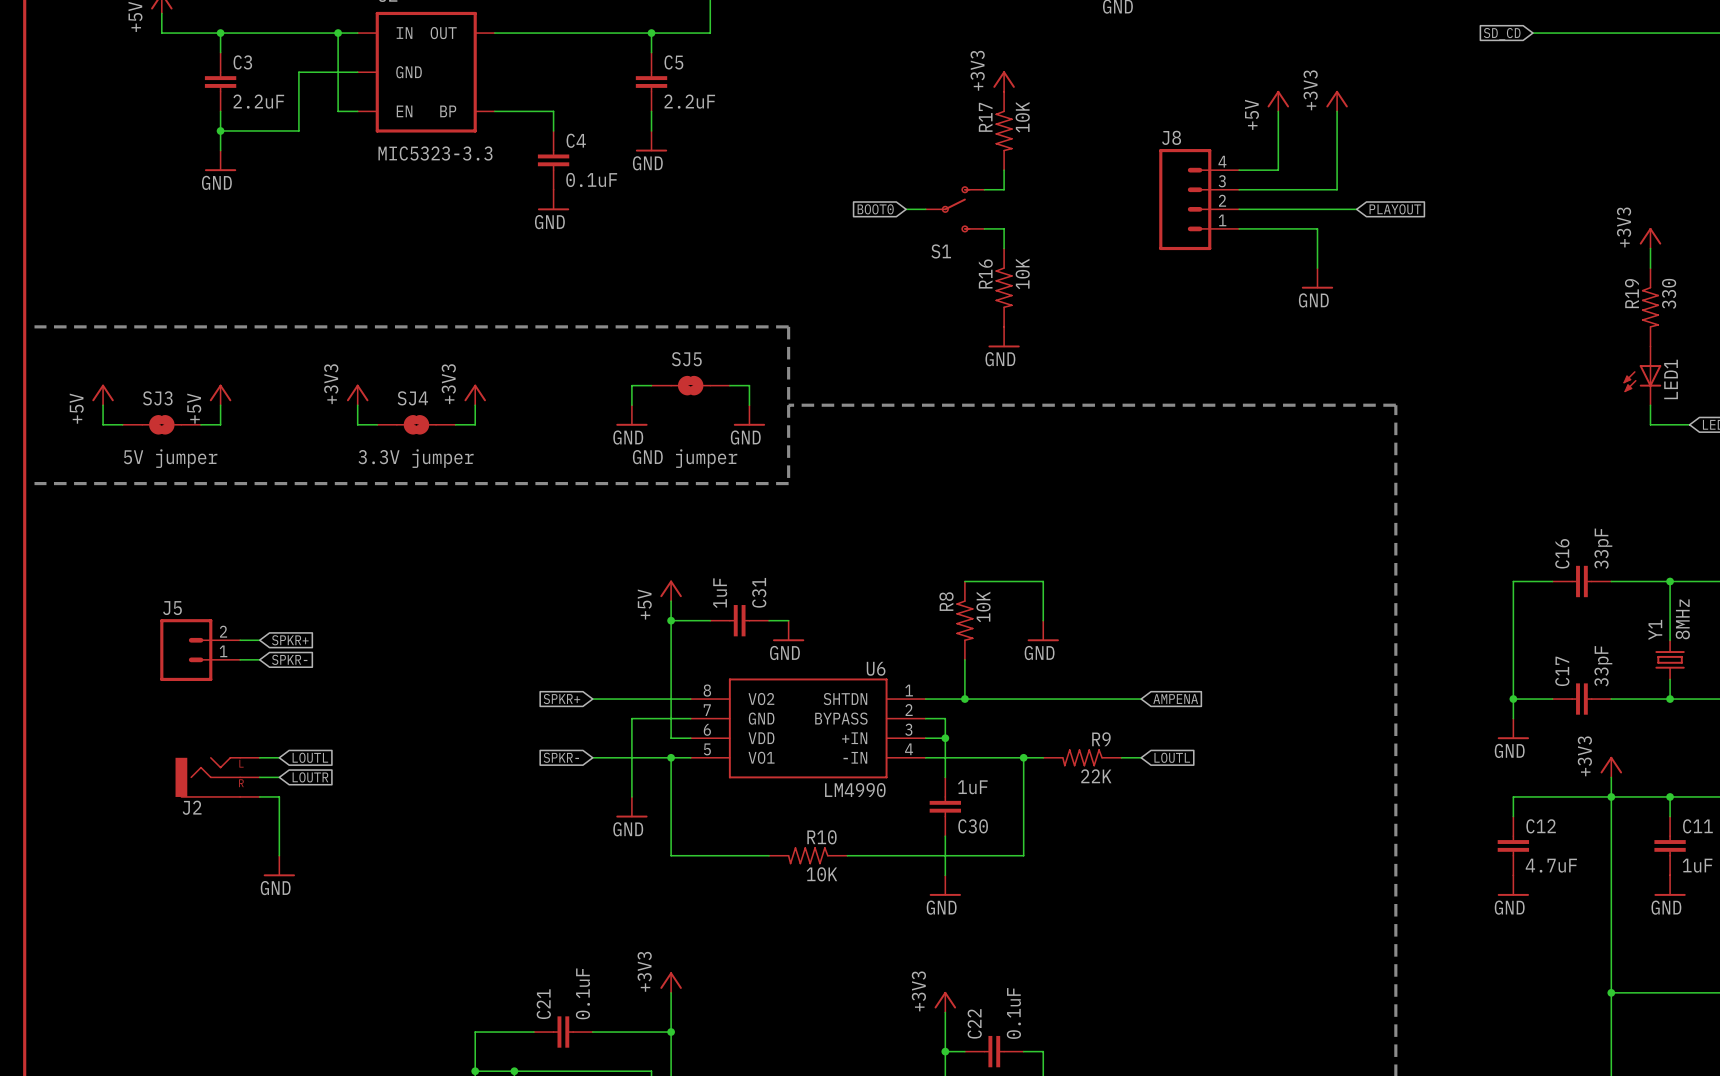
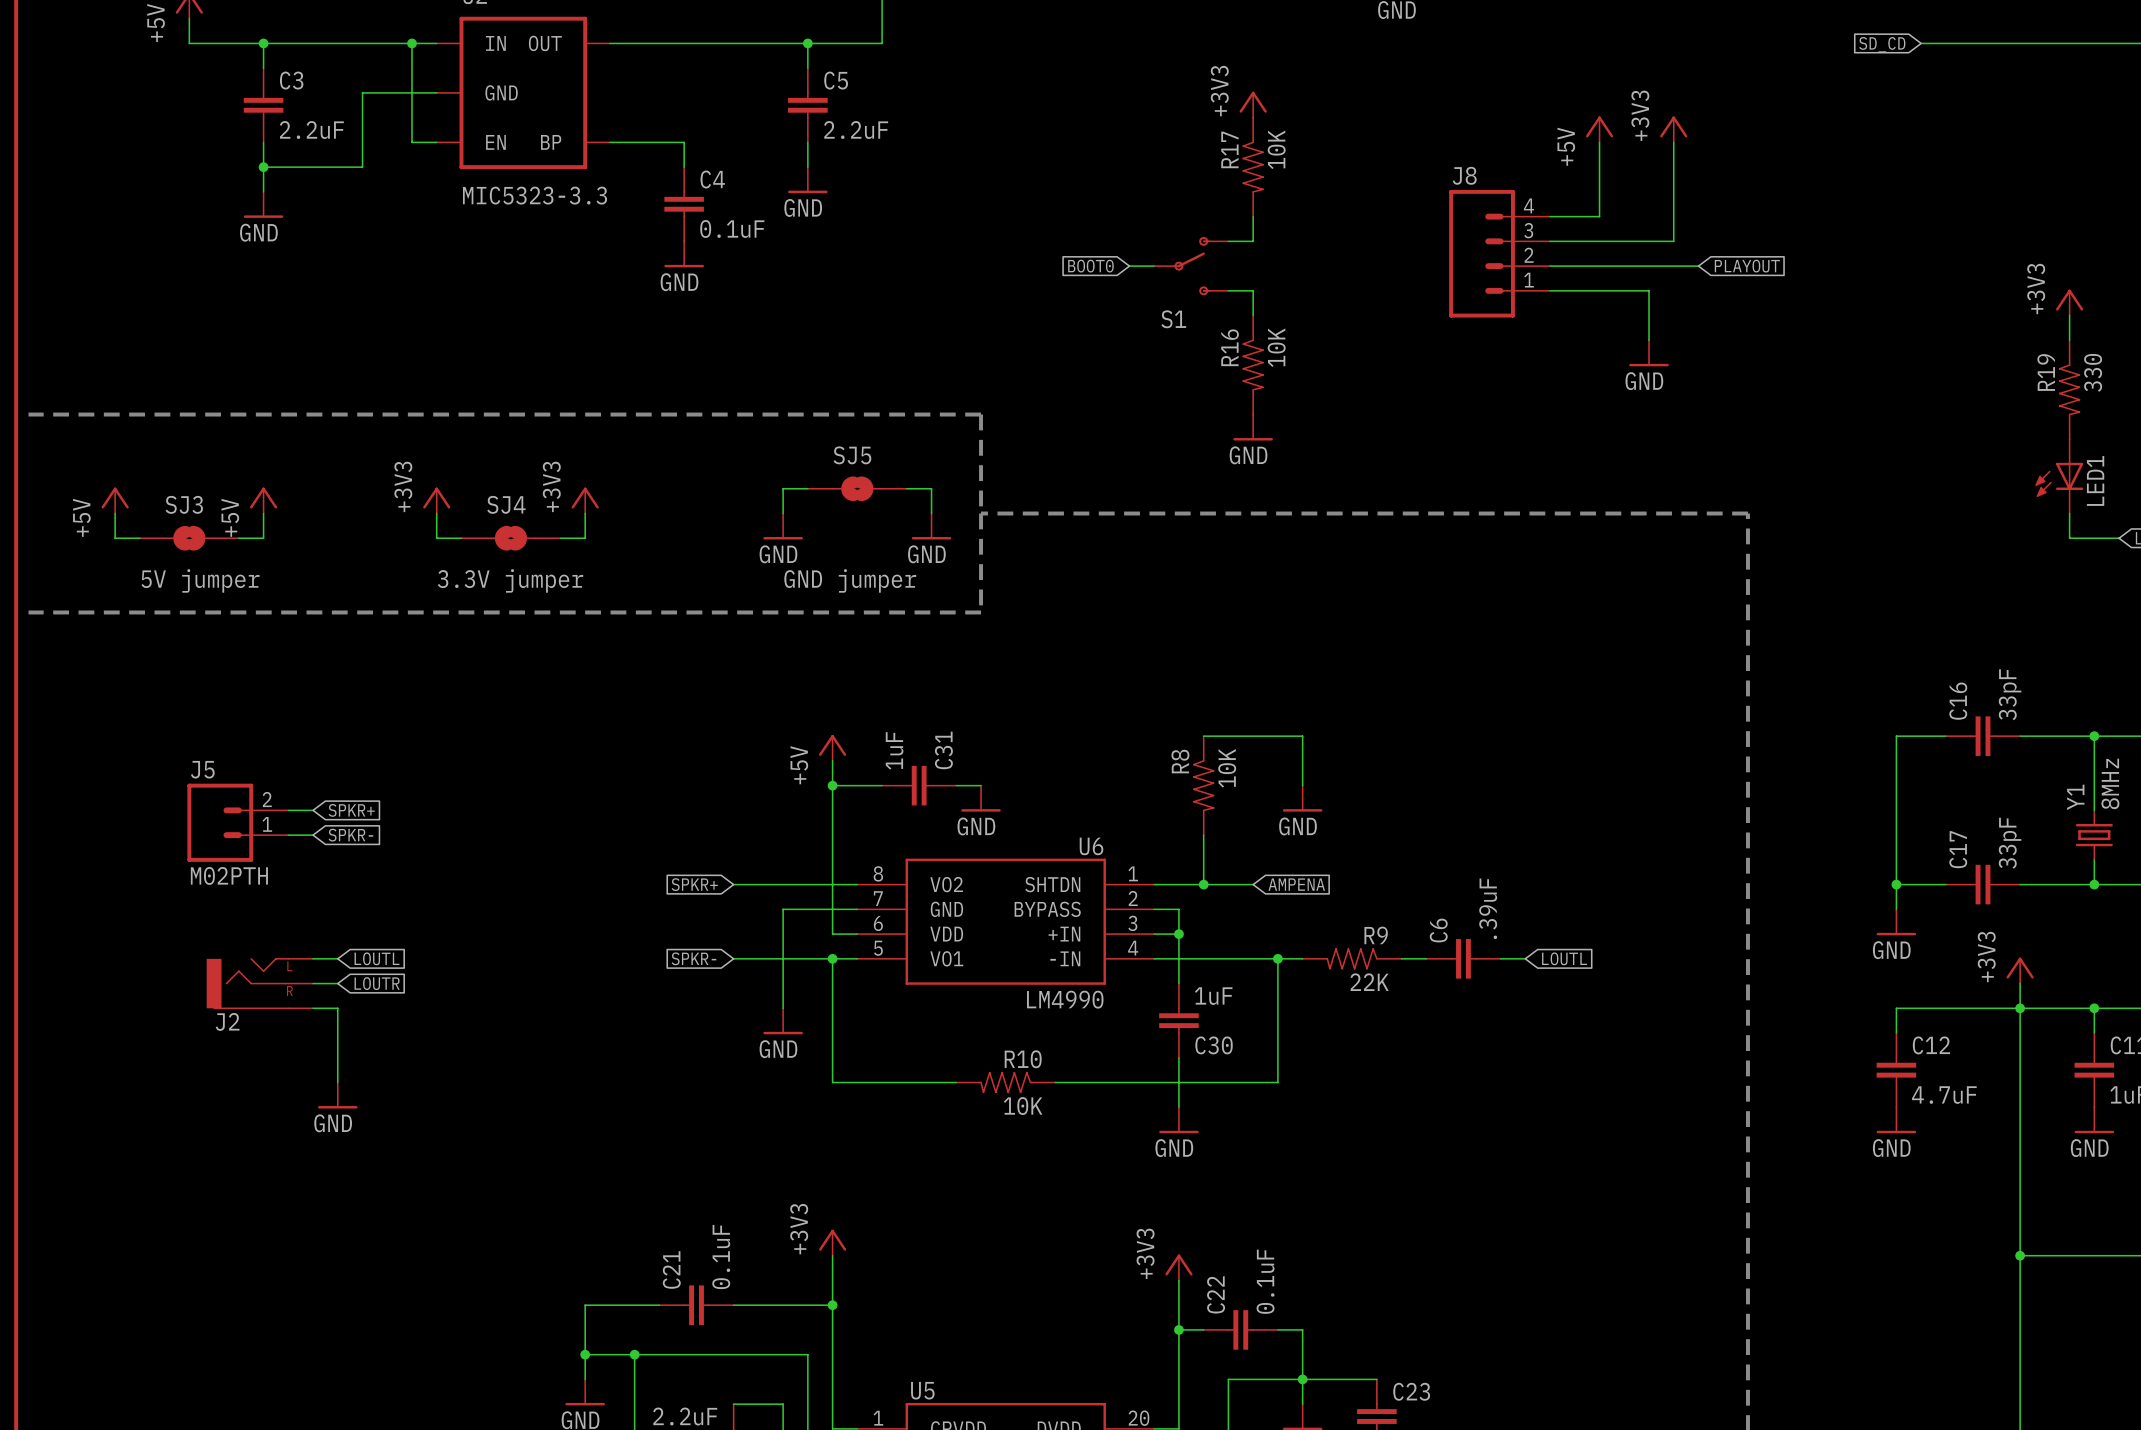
J5 value: none -> M02PTH (229, 875)
wire: (1004, 699) (1141, 699) -> none
global label position: AMPENA (1175, 699) -> AMPENA (1296, 884)
C6: none -> .39uF (1463, 958)
global label position: LOUTL (1172, 757) -> LOUTL (1564, 958)
wire: none -> (1500, 958) (1525, 958)

